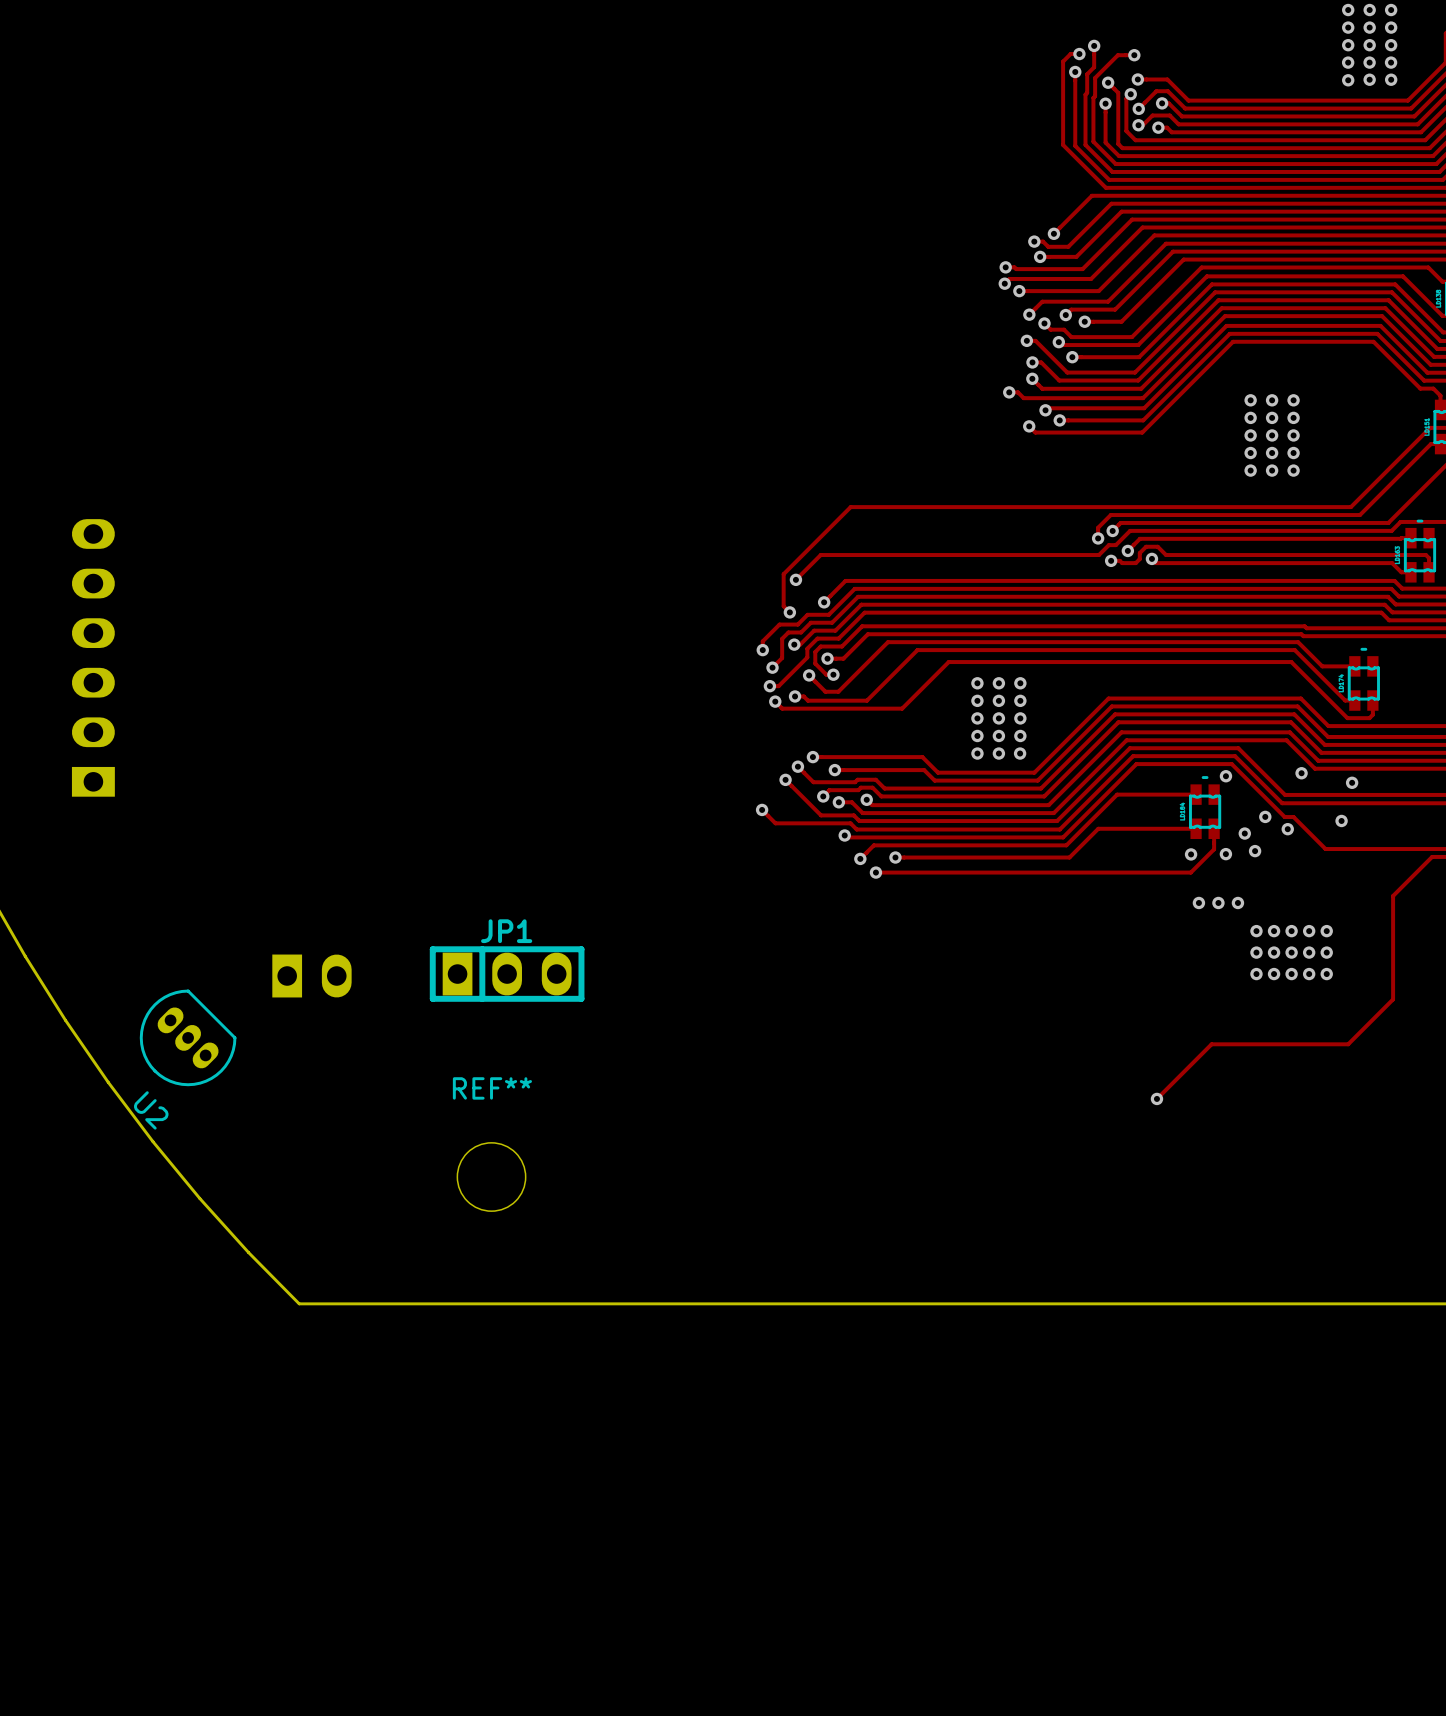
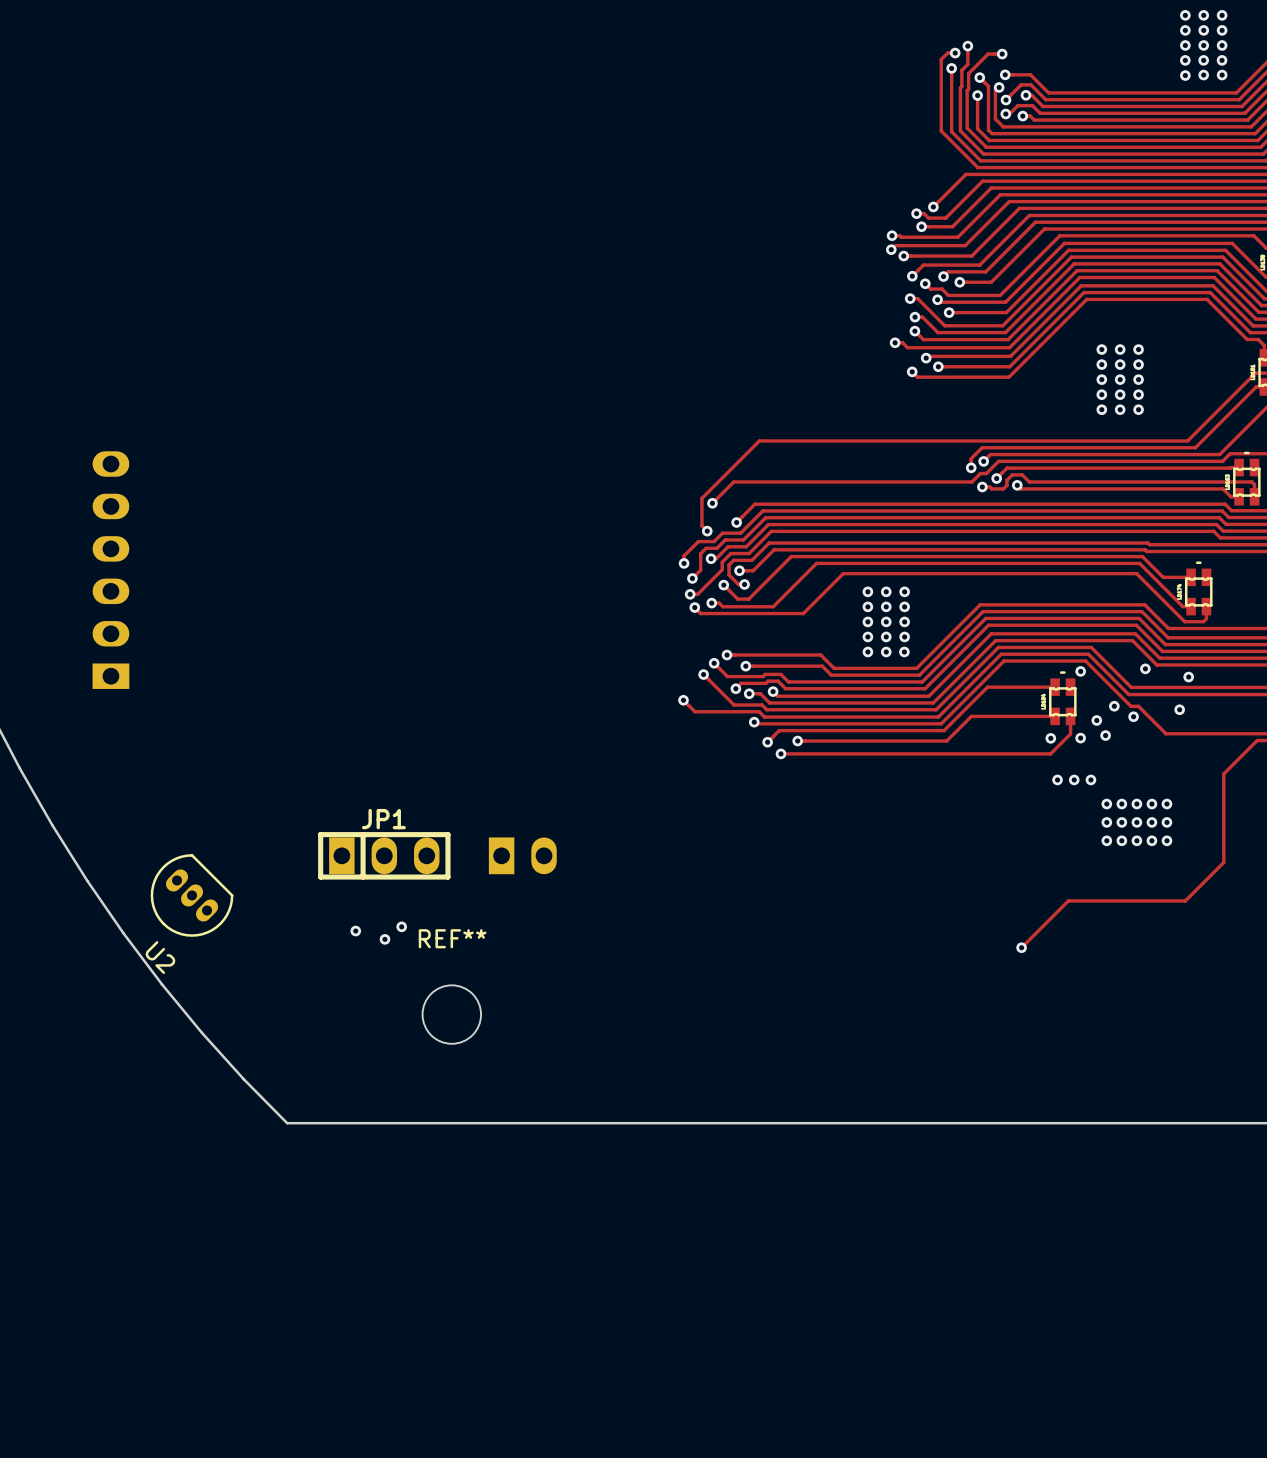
JP1 position: (507, 974) -> (384, 855)
part position: (311, 976) -> (522, 855)
via: none -> (401, 926)
via: none -> (355, 931)
via: none -> (384, 939)

